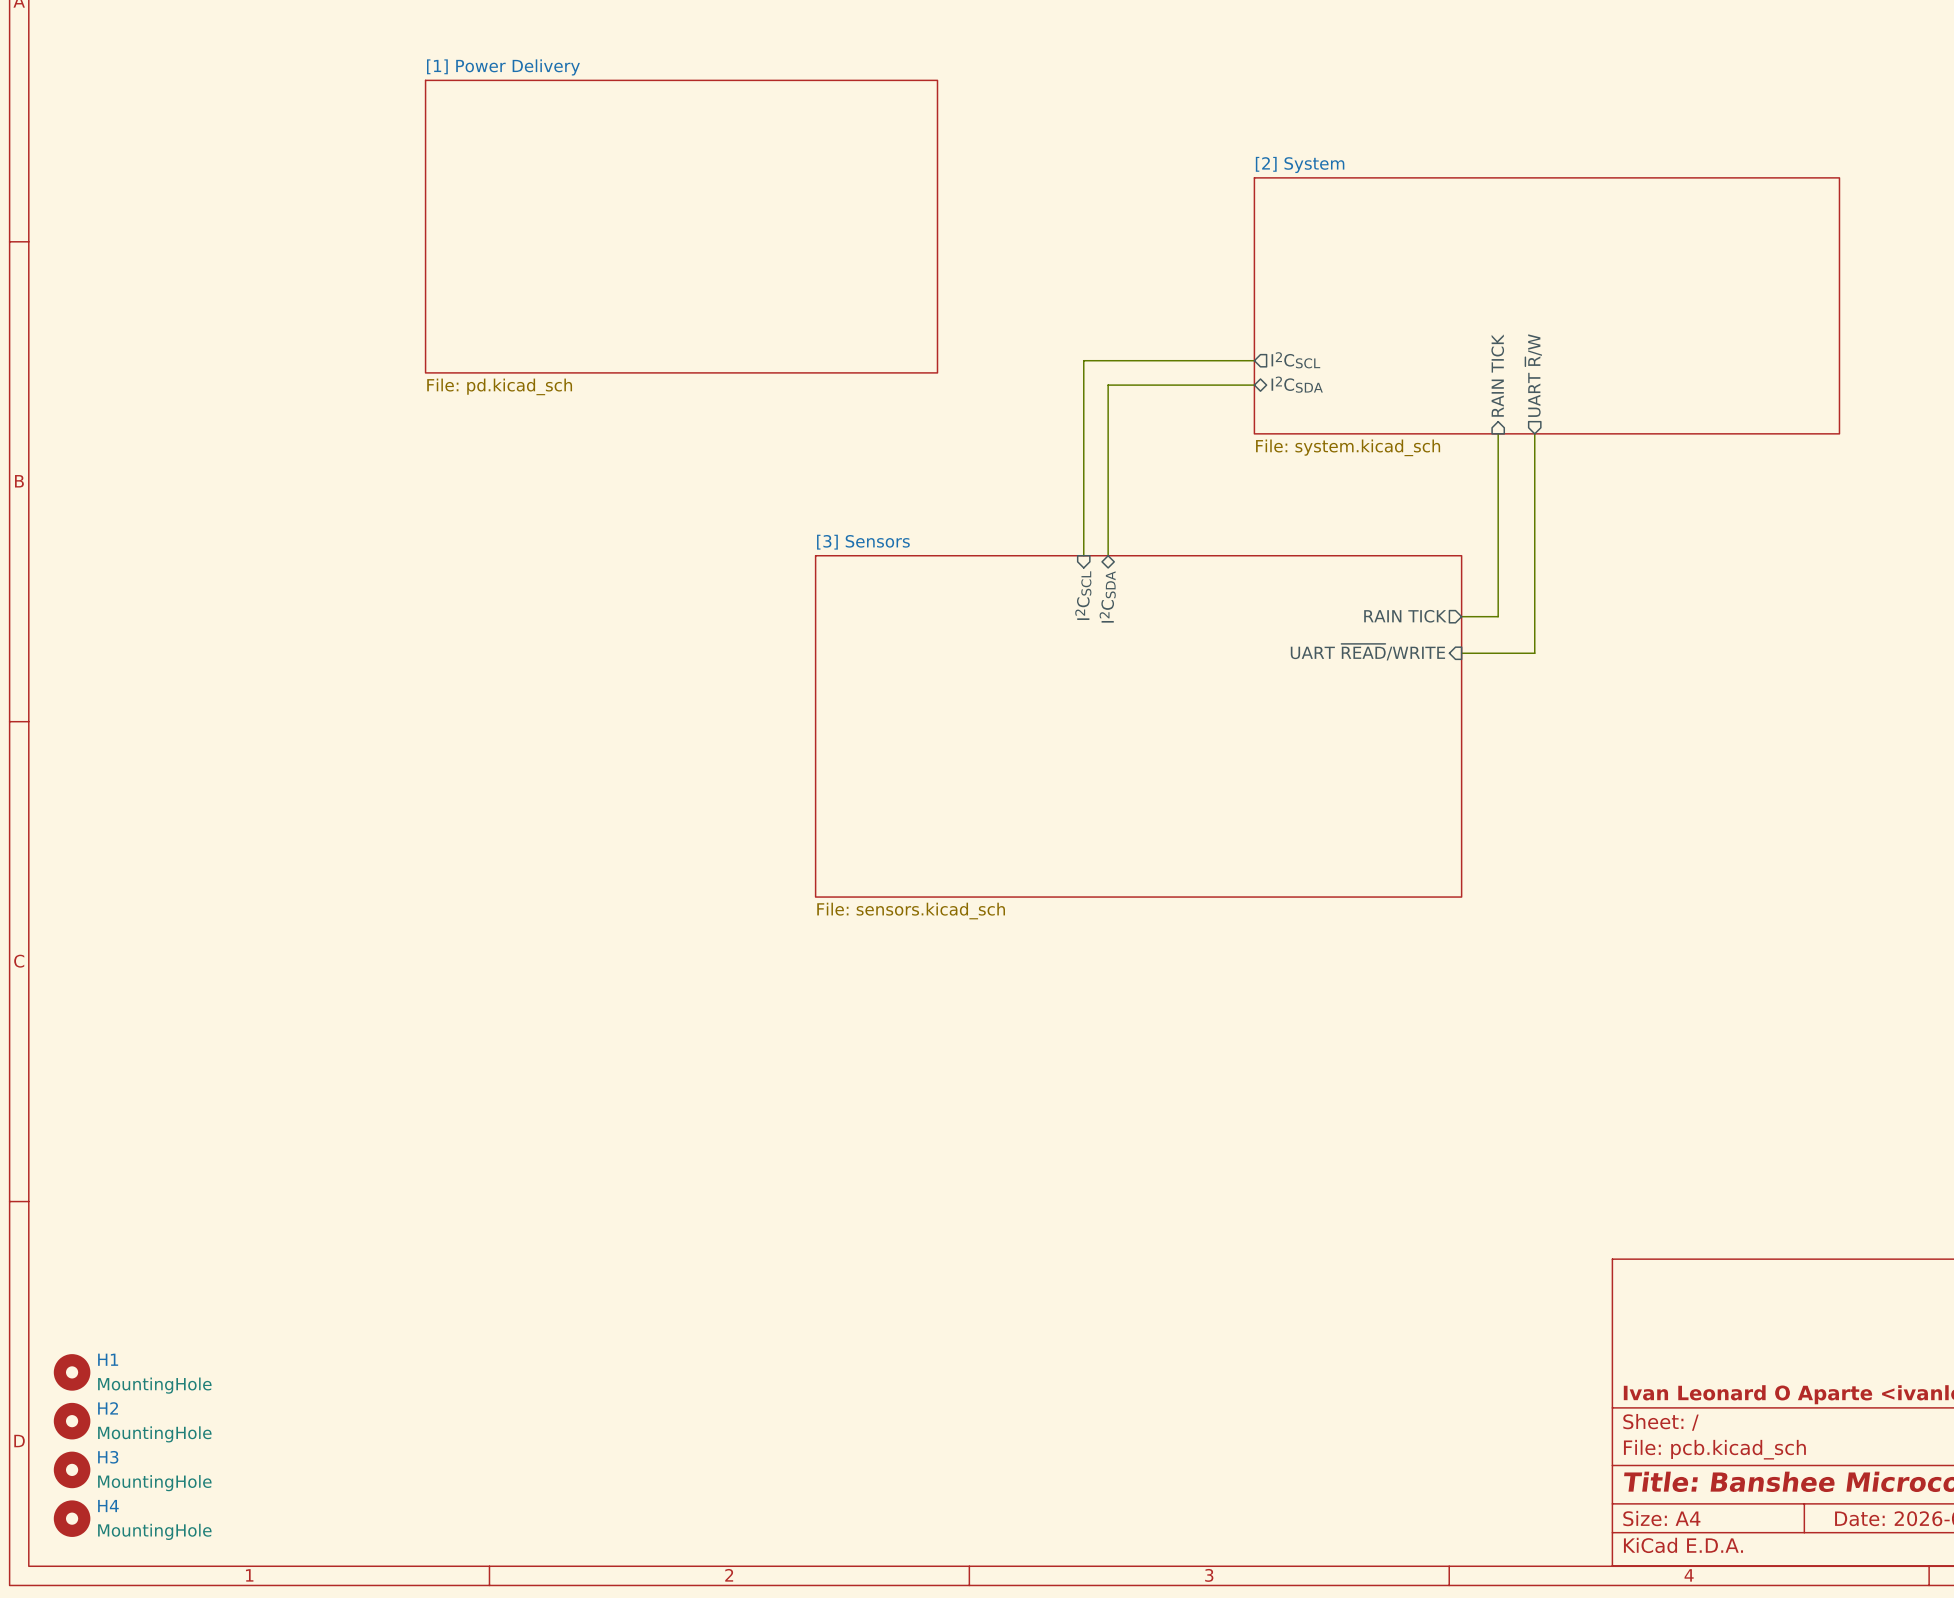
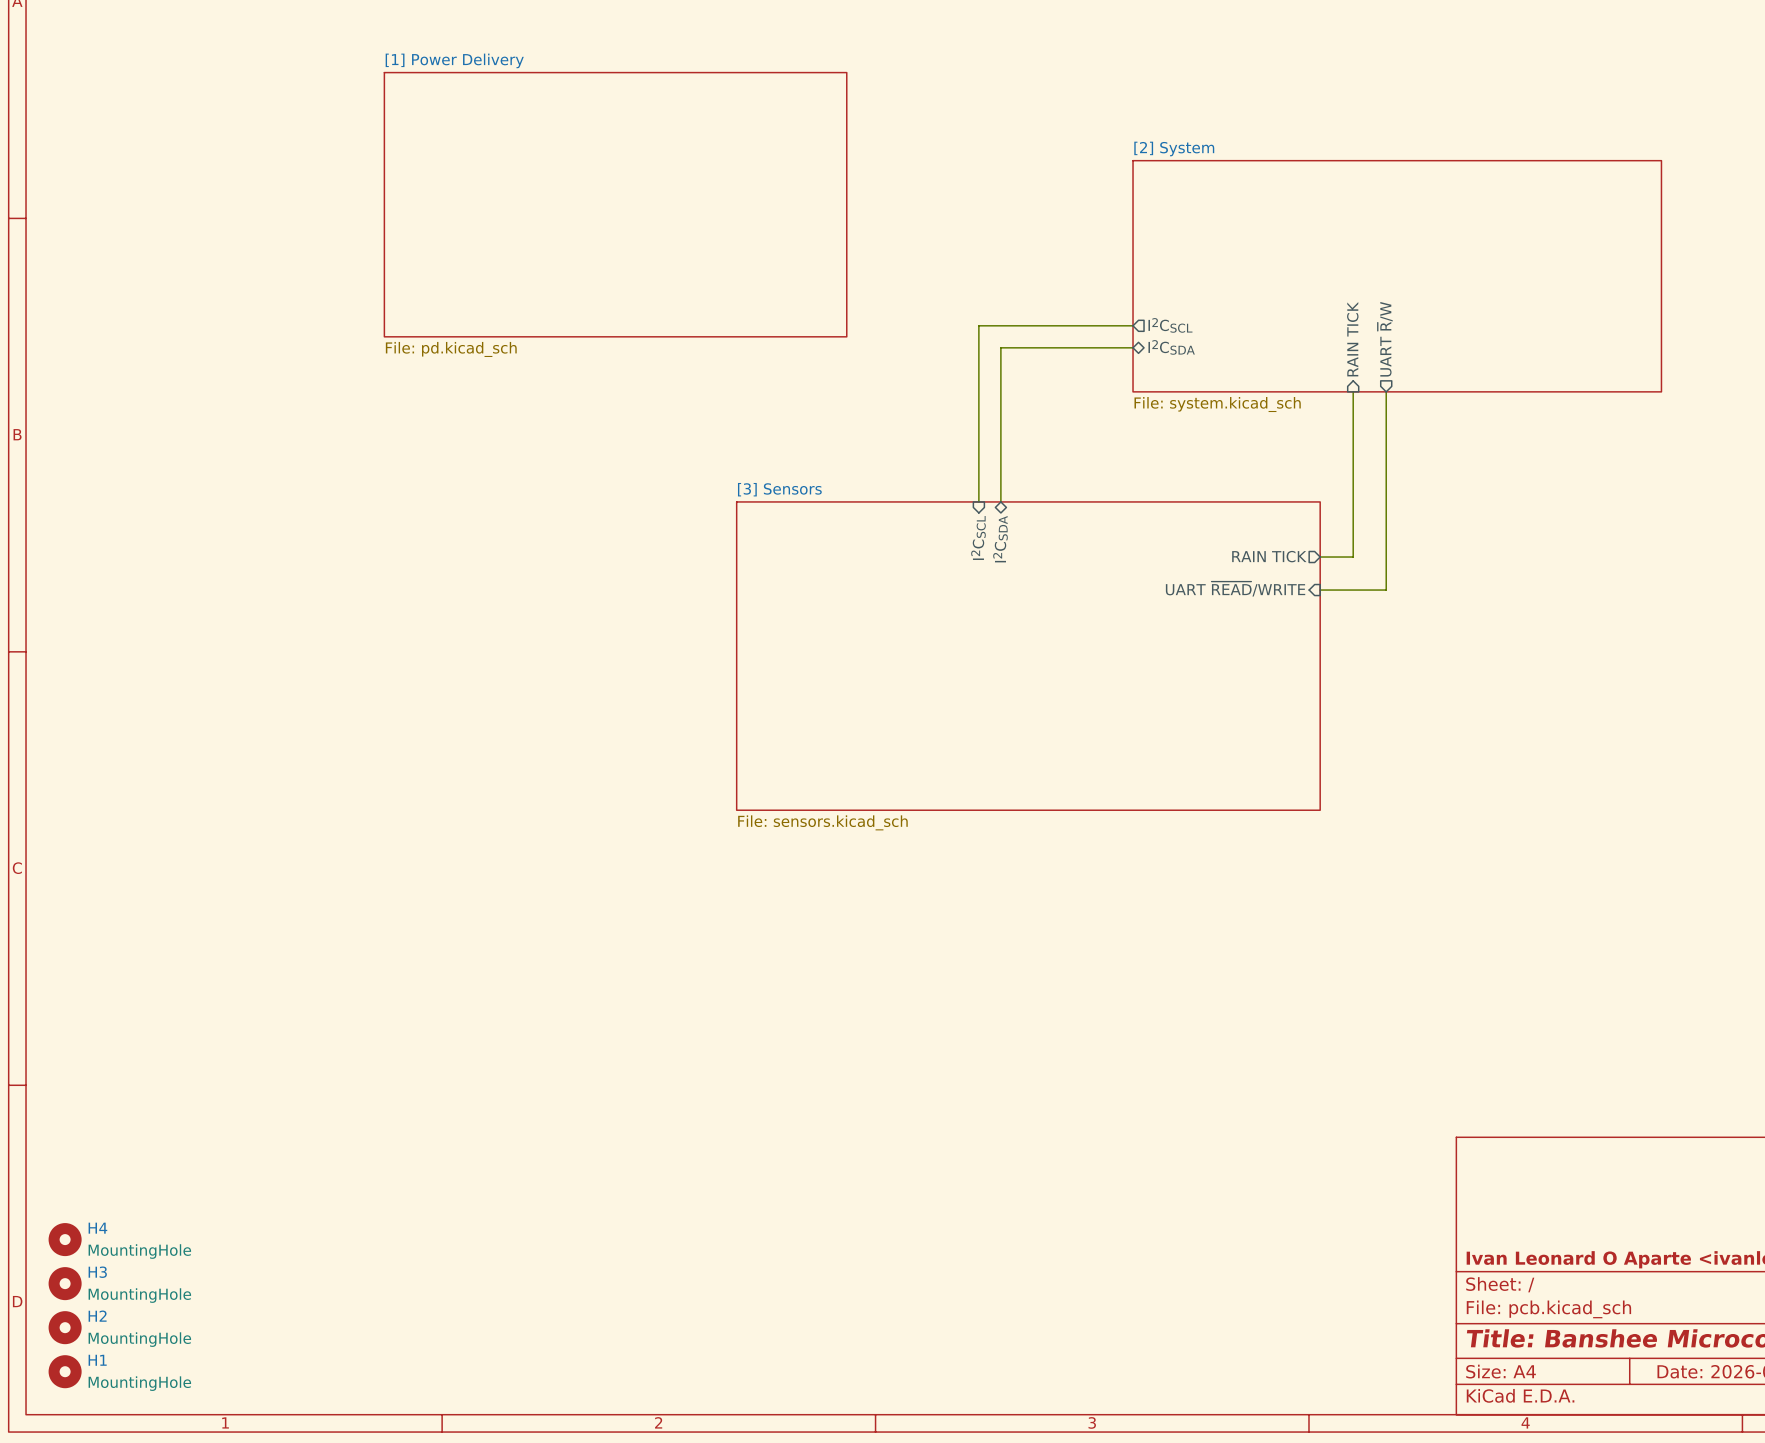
H1 name: H1 (108, 1359) -> H4 (97, 1228)
H2 name: H2 (108, 1408) -> H3 (97, 1272)
H3 name: H3 (108, 1457) -> H2 (97, 1316)
H4 name: H4 (108, 1506) -> H1 (97, 1360)

